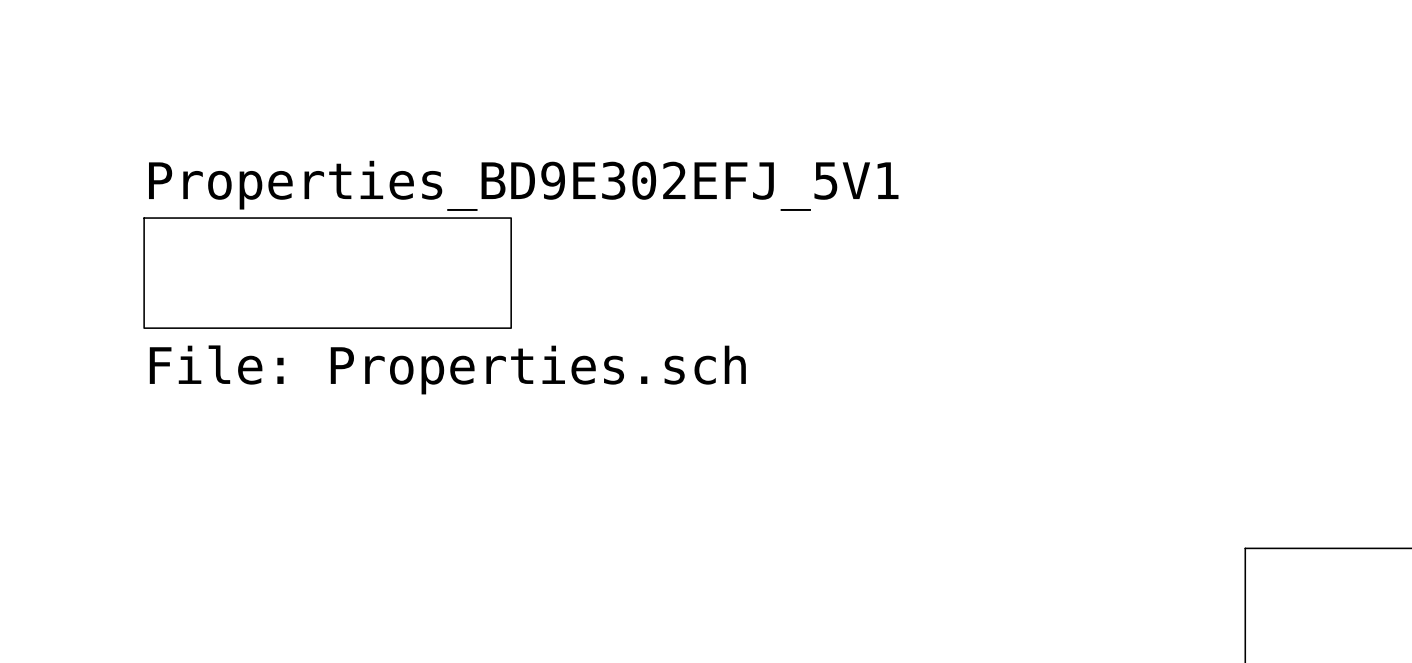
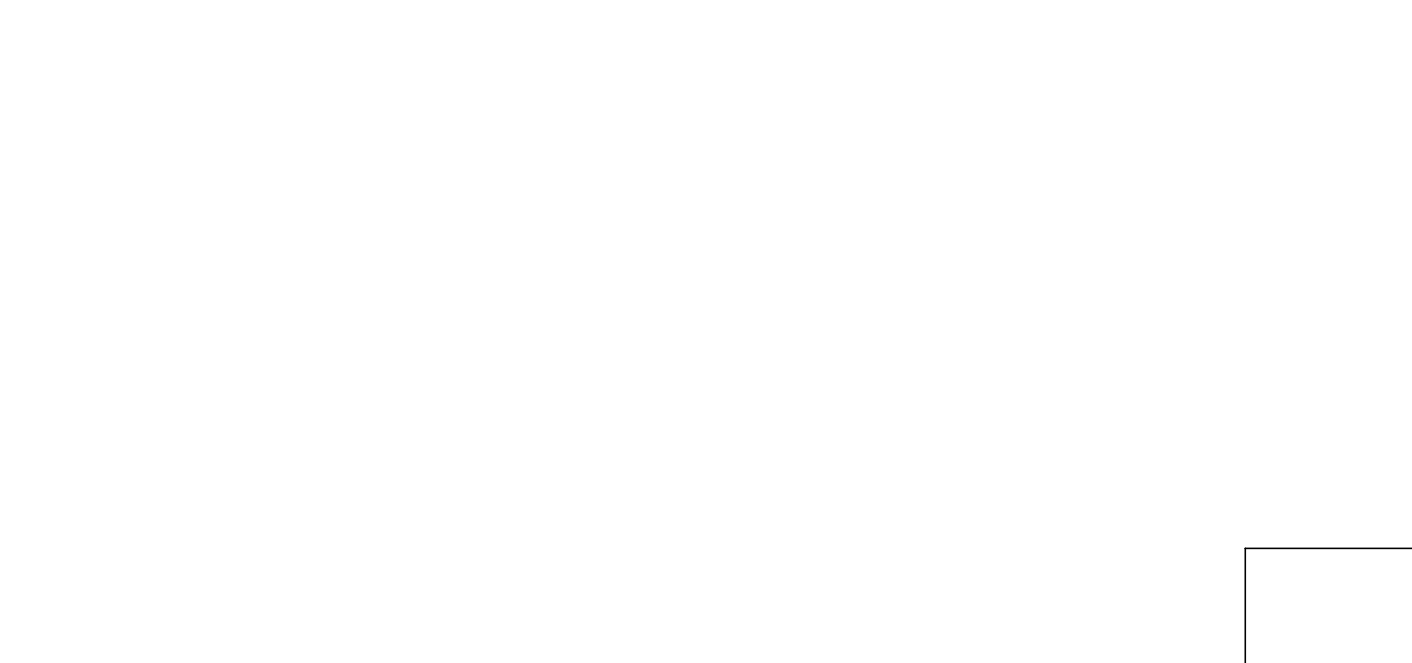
sheet Properties_BD9E302EFJ_5V1: File: Properties.sch (327, 273) -> none

